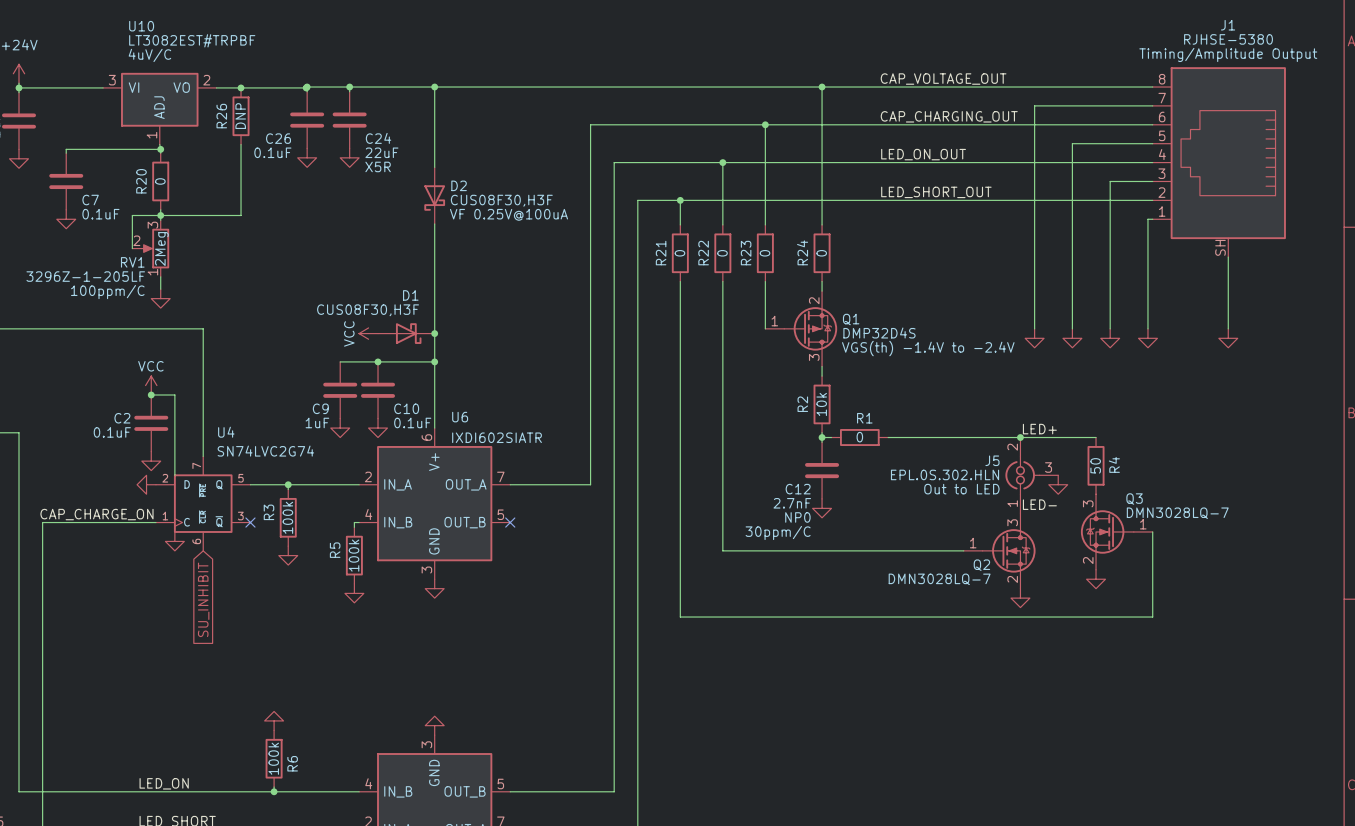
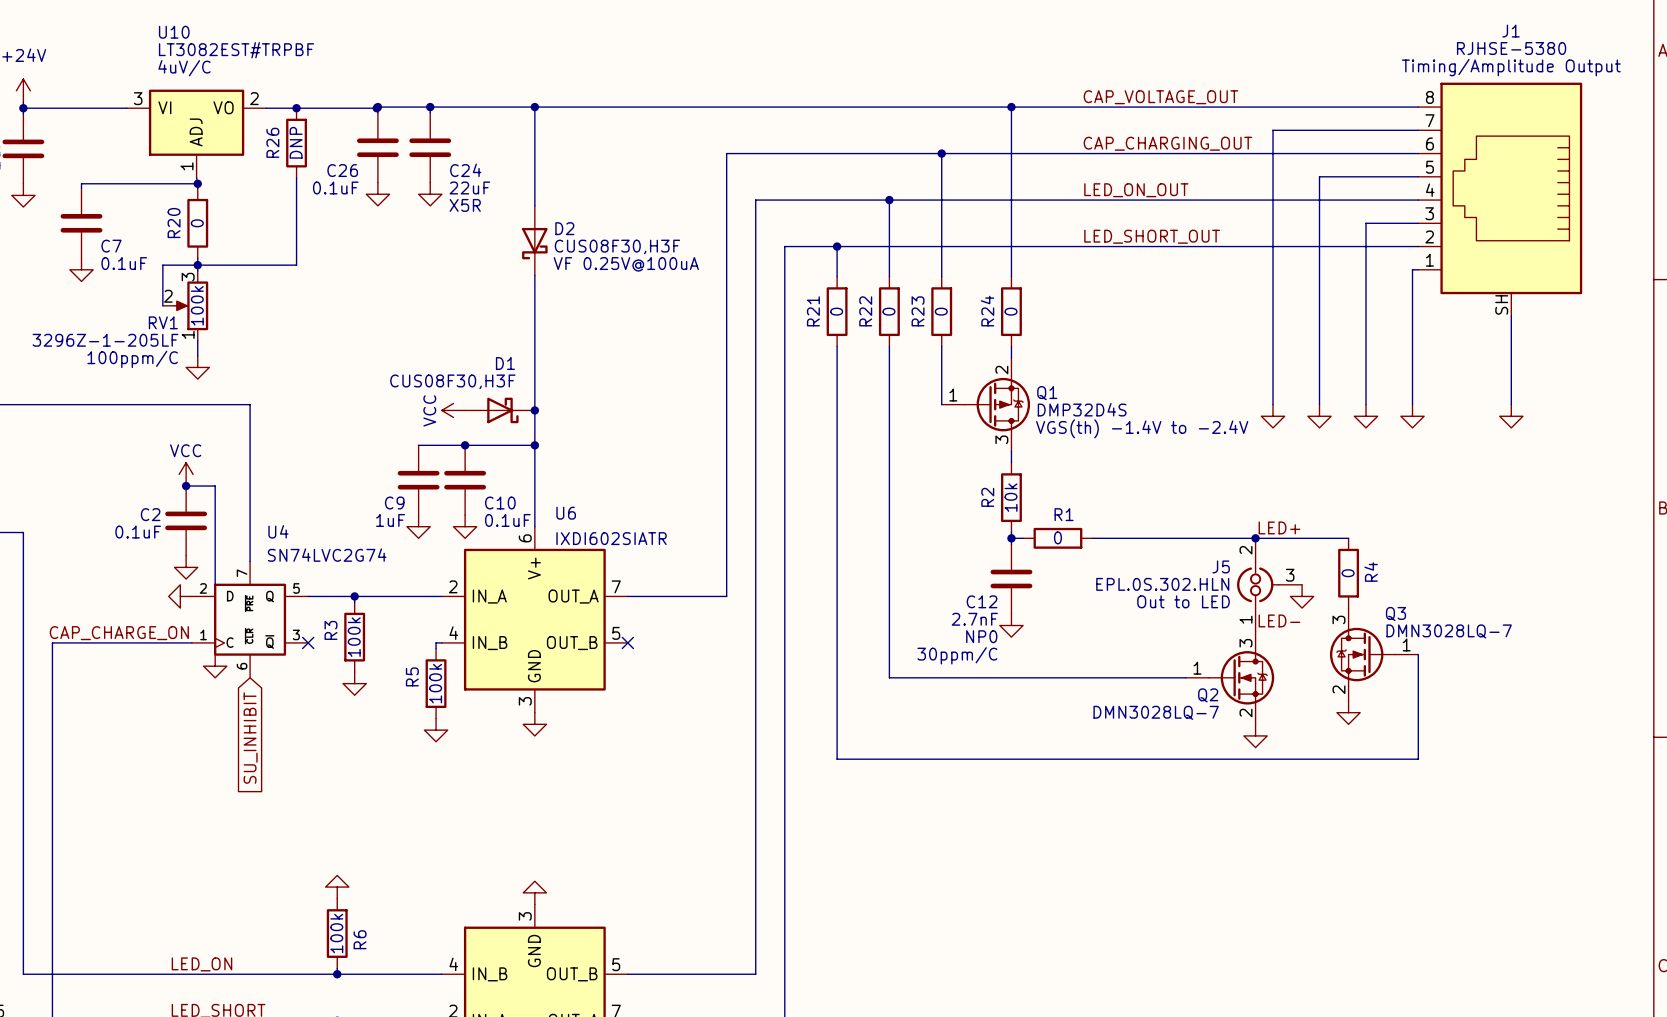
RV1 value: 2Meg (161, 249) -> 100k (197, 305)
R4 value: 50 (1095, 465) -> 0 (1348, 573)

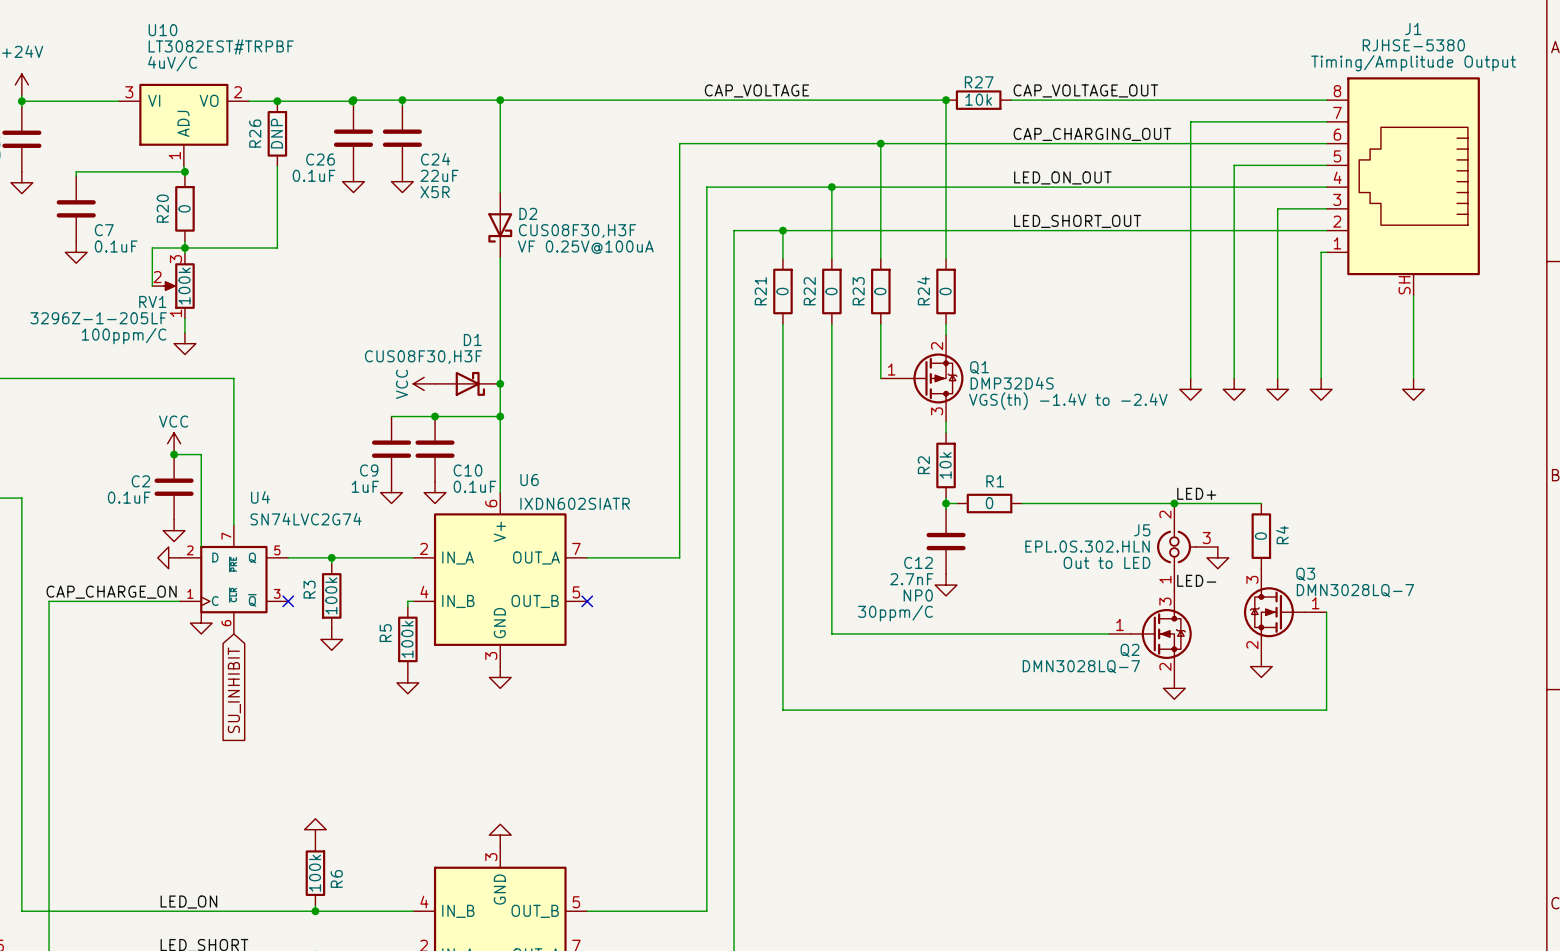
label: none -> CAP_VOLTAGE (756, 90)
wire: (1011, 107) (1081, 107) -> none
R27: none -> 10k (978, 100)
U6 value: IXDI602SIATR (611, 538) -> IXDN602SIATR (575, 503)

